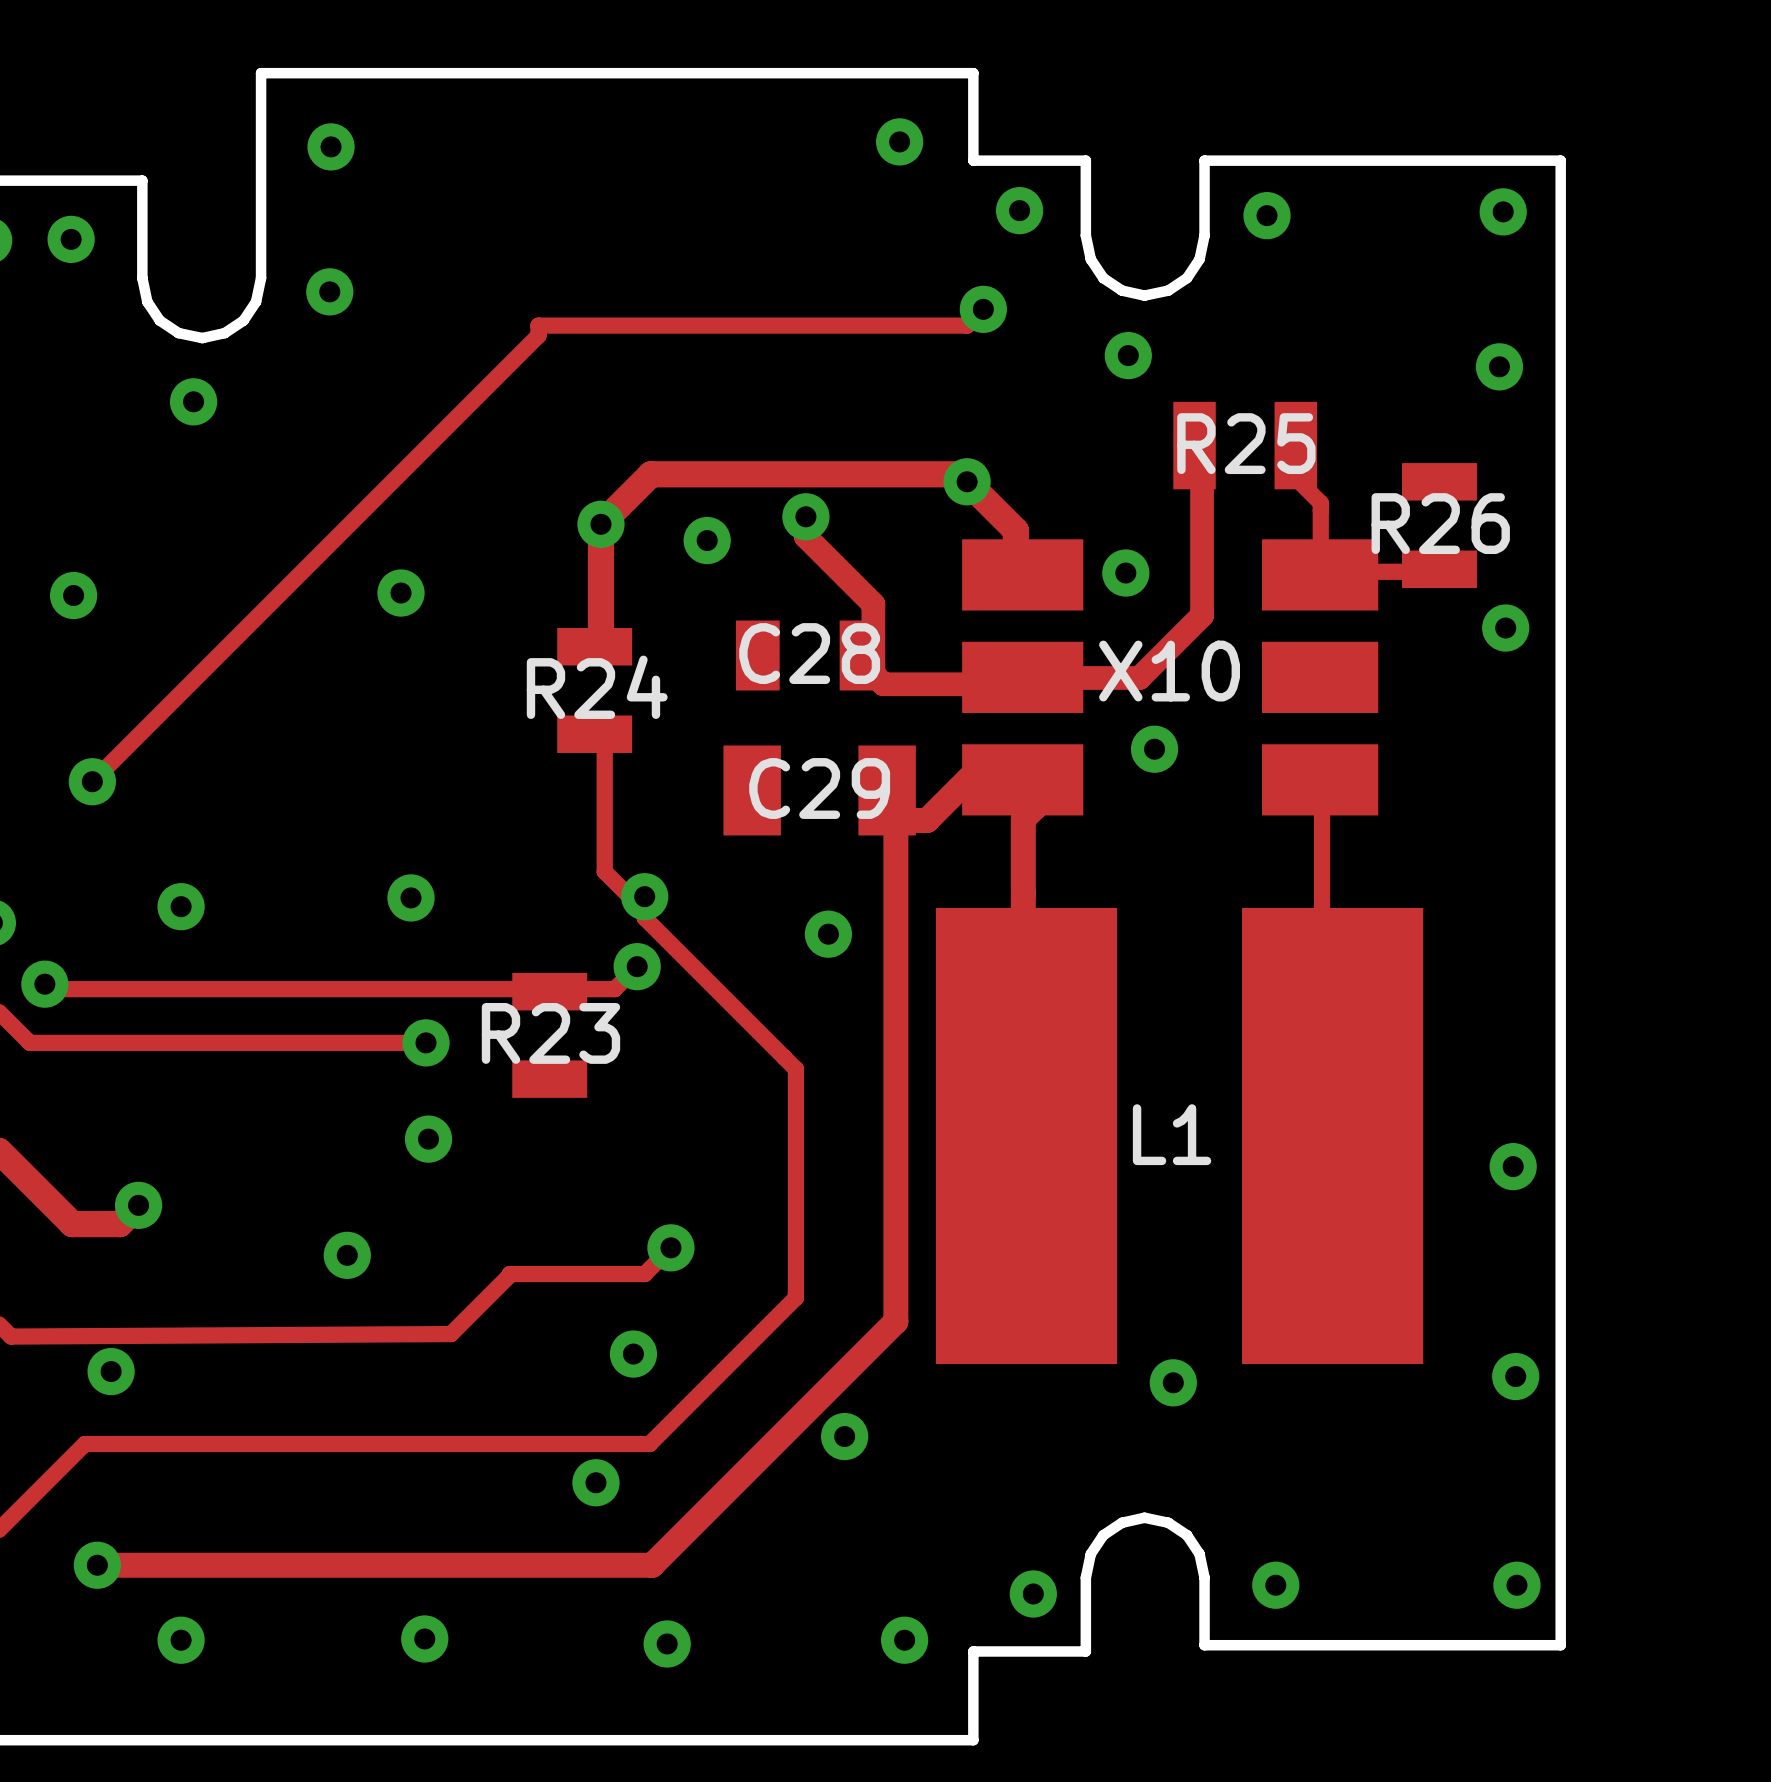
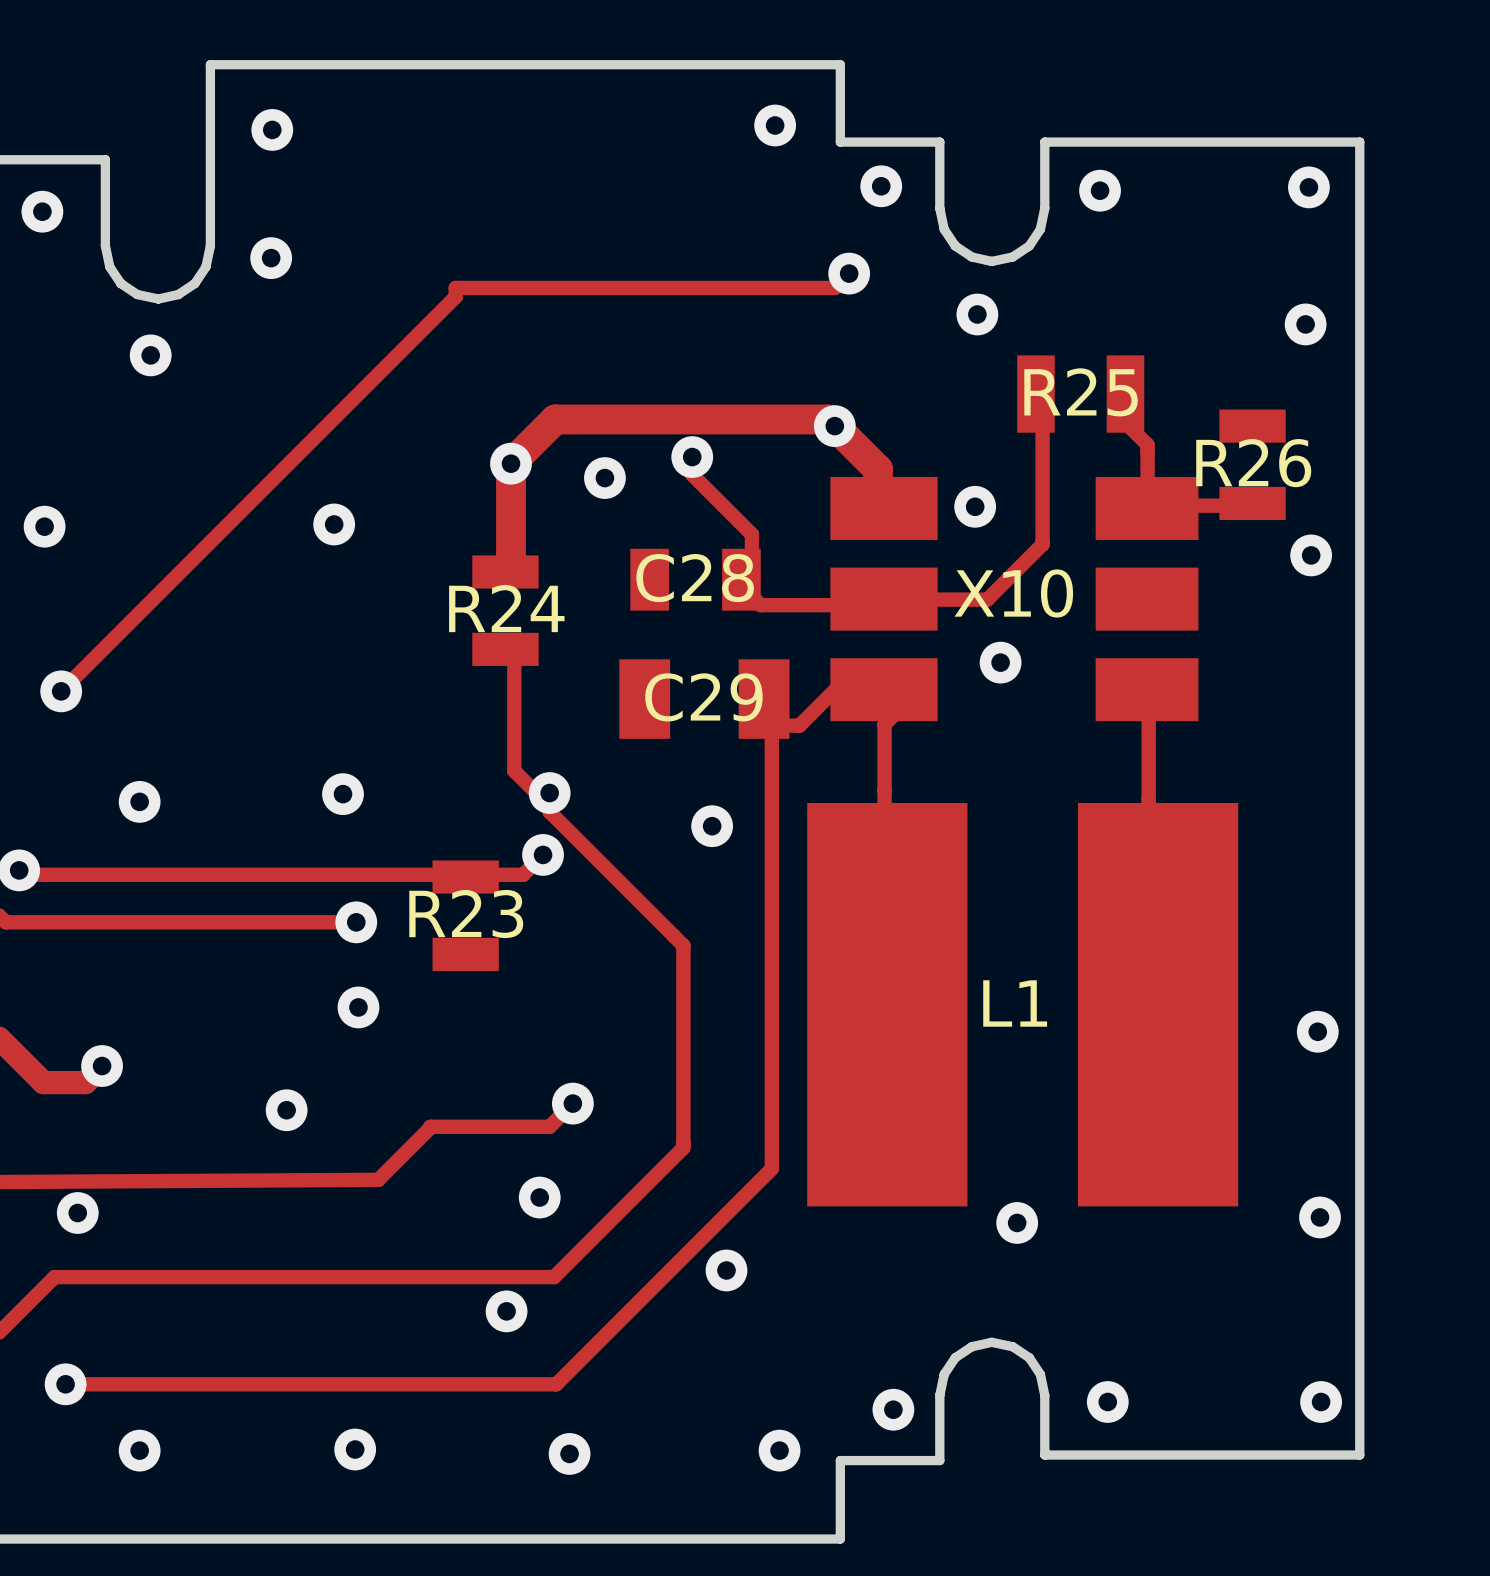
track width: thick (1202, 423) (1202, 615) (1139, 678) (1063, 678) (1057, 684) (883, 684) (873, 674) (873, 604) (805, 536) (805, 516) -> thin (1042, 374) (1042, 544) (987, 599) (919, 599) (914, 605) (760, 605) (751, 596) (751, 534) (692, 474) (692, 457)
track width: thin (1015, 575) (1015, 530) (959, 474) (650, 474) (600, 524) (600, 646) -> thick (877, 509) (877, 469) (828, 419) (555, 419) (510, 463) (510, 571)
track width: thick (1023, 1305) (1023, 819) (1035, 806) (1035, 775) (977, 775) (974, 772) (927, 820) (895, 820) (895, 1321) (652, 1565) (97, 1565) -> thin (884, 1154) (884, 724) (895, 713) (895, 685) (843, 685) (841, 683) (799, 725) (771, 725) (771, 1168) (556, 1384) (65, 1384)

